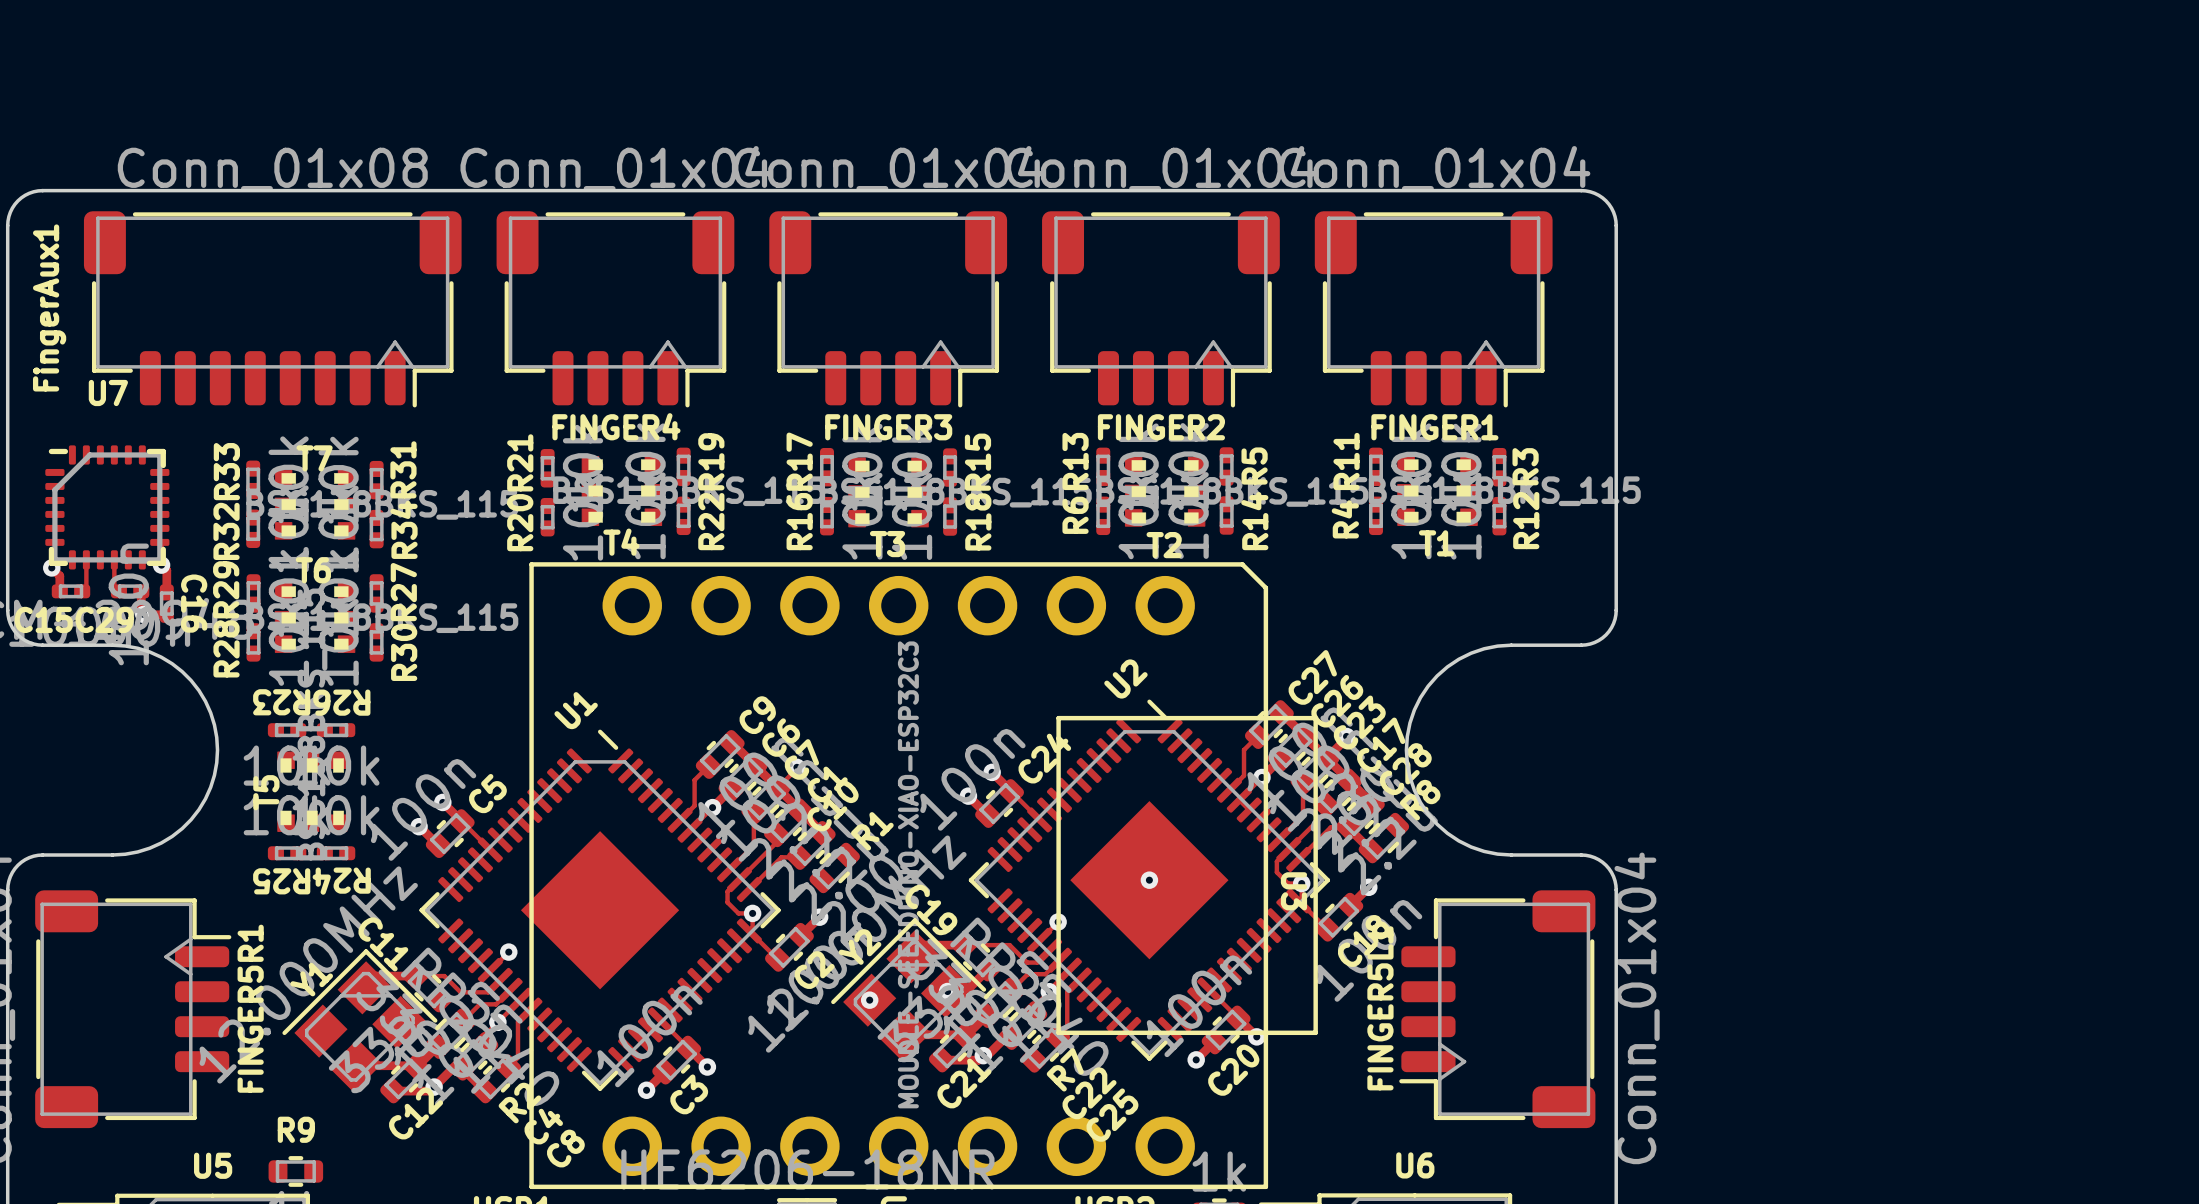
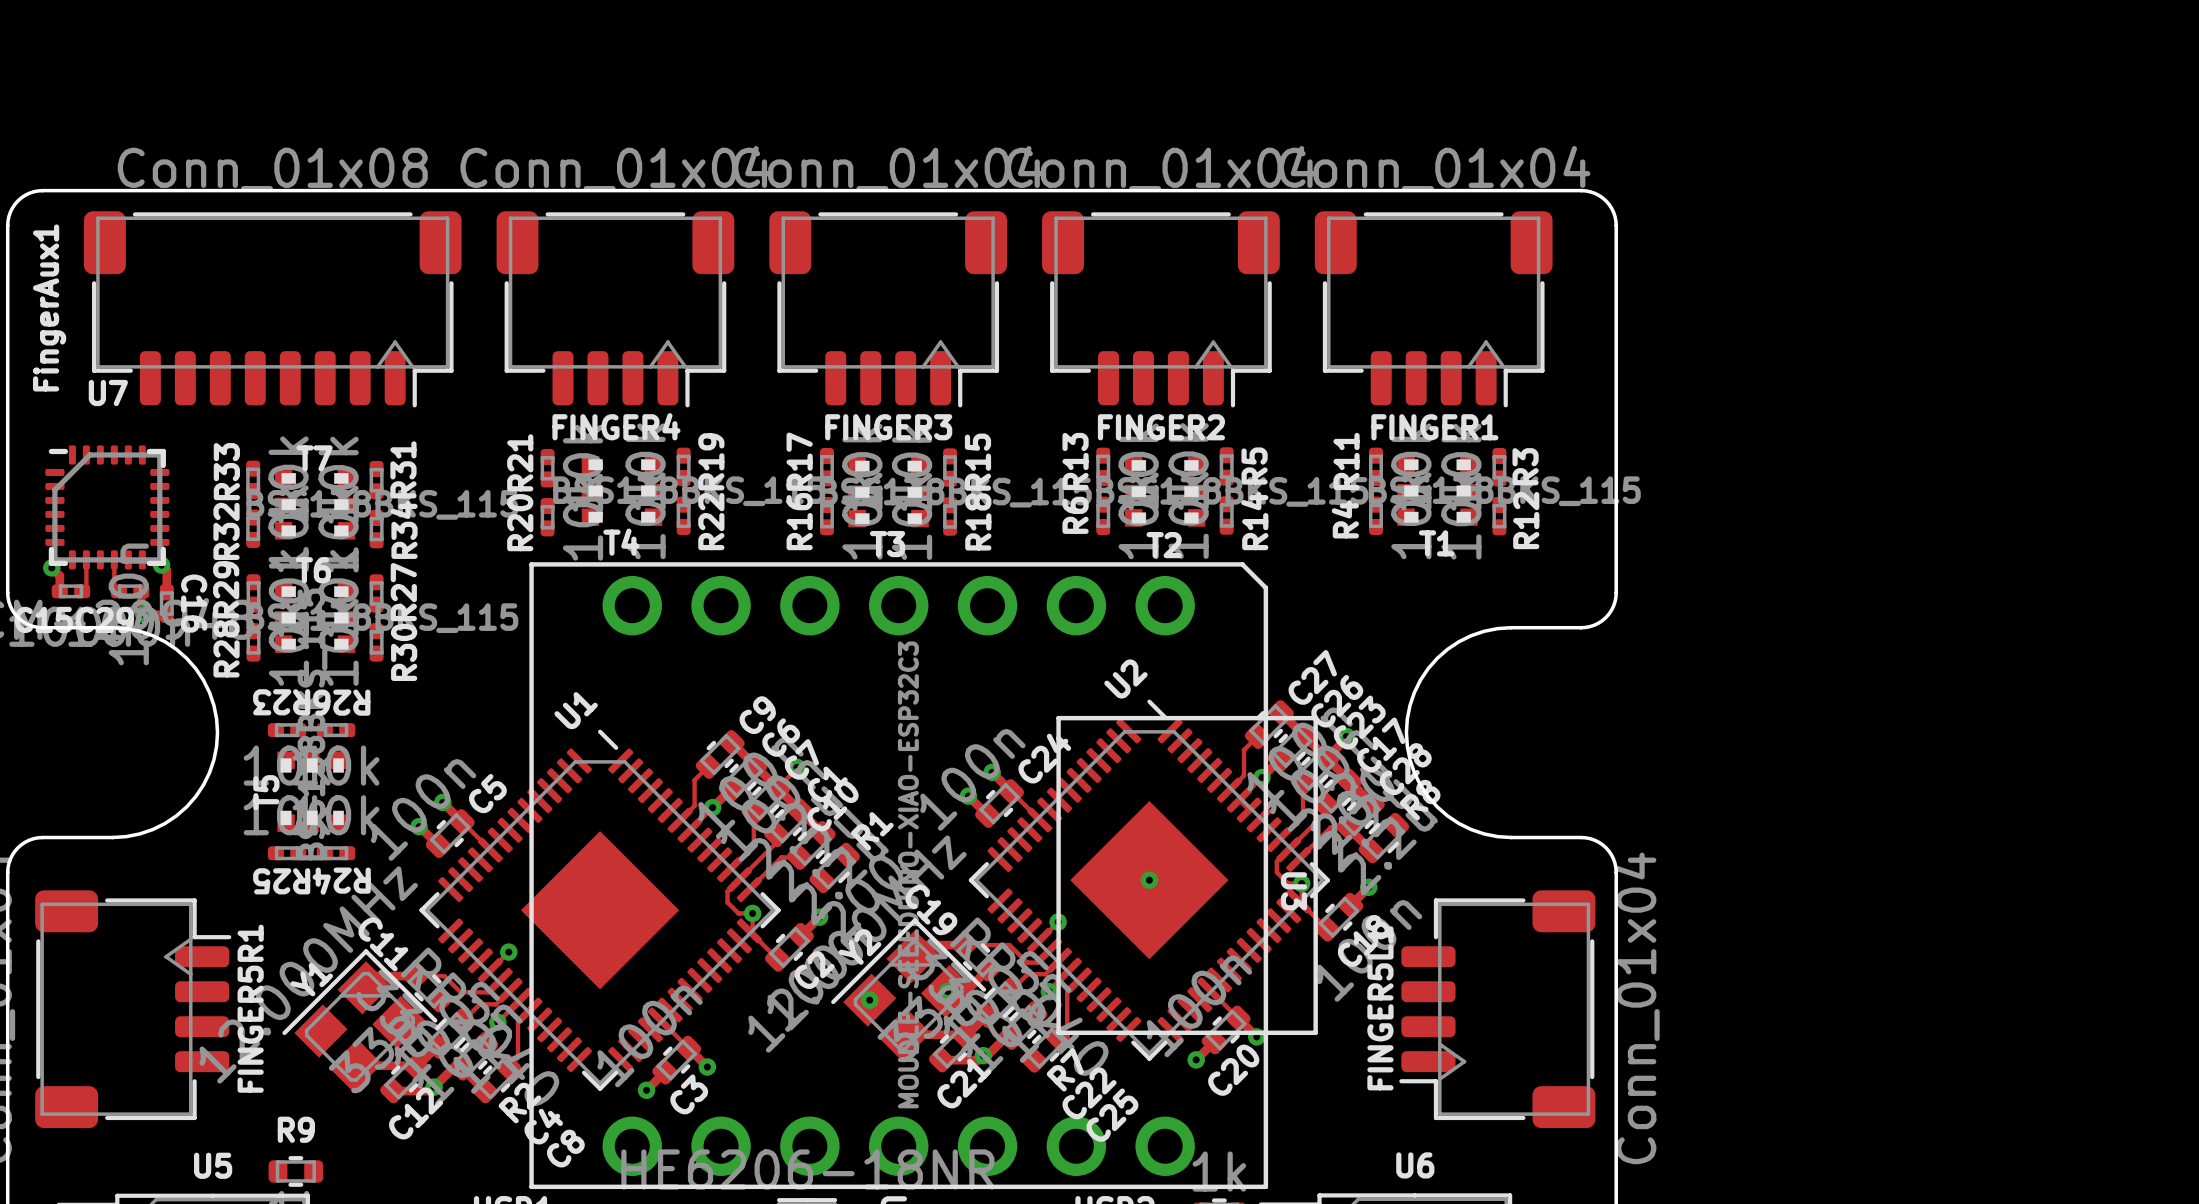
board edge: (7, 592) (8, 614) (10, 623) (17, 634) (29, 642) (42, 645) (125, 645) (149, 652) (172, 663) (191, 680) (205, 701) (214, 725) (217, 750) (214, 775) (205, 798) (191, 819) (172, 836) (149, 848) (125, 854) (33, 856) (21, 862) (14, 868) (8, 880) (7, 889) -> (7, 592) (10, 606) (14, 614) (25, 623) (33, 626) (126, 628) (152, 635) (165, 641) (186, 658) (203, 680) (213, 705) (217, 732) (213, 759) (203, 785) (186, 806) (176, 815) (152, 829) (126, 836) (42, 837) (29, 840) (17, 847) (10, 859) (8, 867) (7, 889)
board edge: (1616, 592) (1615, 614) (1613, 623) (1605, 634) (1594, 642) (1581, 645) (1497, 646) (1471, 653) (1447, 666) (1428, 686) (1414, 709) (1409, 722) (1406, 750) (1409, 777) (1420, 802) (1437, 824) (1458, 840) (1471, 847) (1497, 854) (1590, 856) (1602, 862) (1608, 868) (1613, 876) (1616, 889) -> (1616, 592) (1613, 606) (1608, 614) (1598, 623) (1590, 626) (1497, 628) (1471, 635) (1458, 641) (1437, 658) (1420, 680) (1409, 705) (1406, 732) (1409, 759) (1414, 772) (1428, 796) (1447, 815) (1471, 829) (1497, 836) (1581, 837) (1594, 840) (1605, 847) (1613, 859) (1615, 867) (1616, 889)

